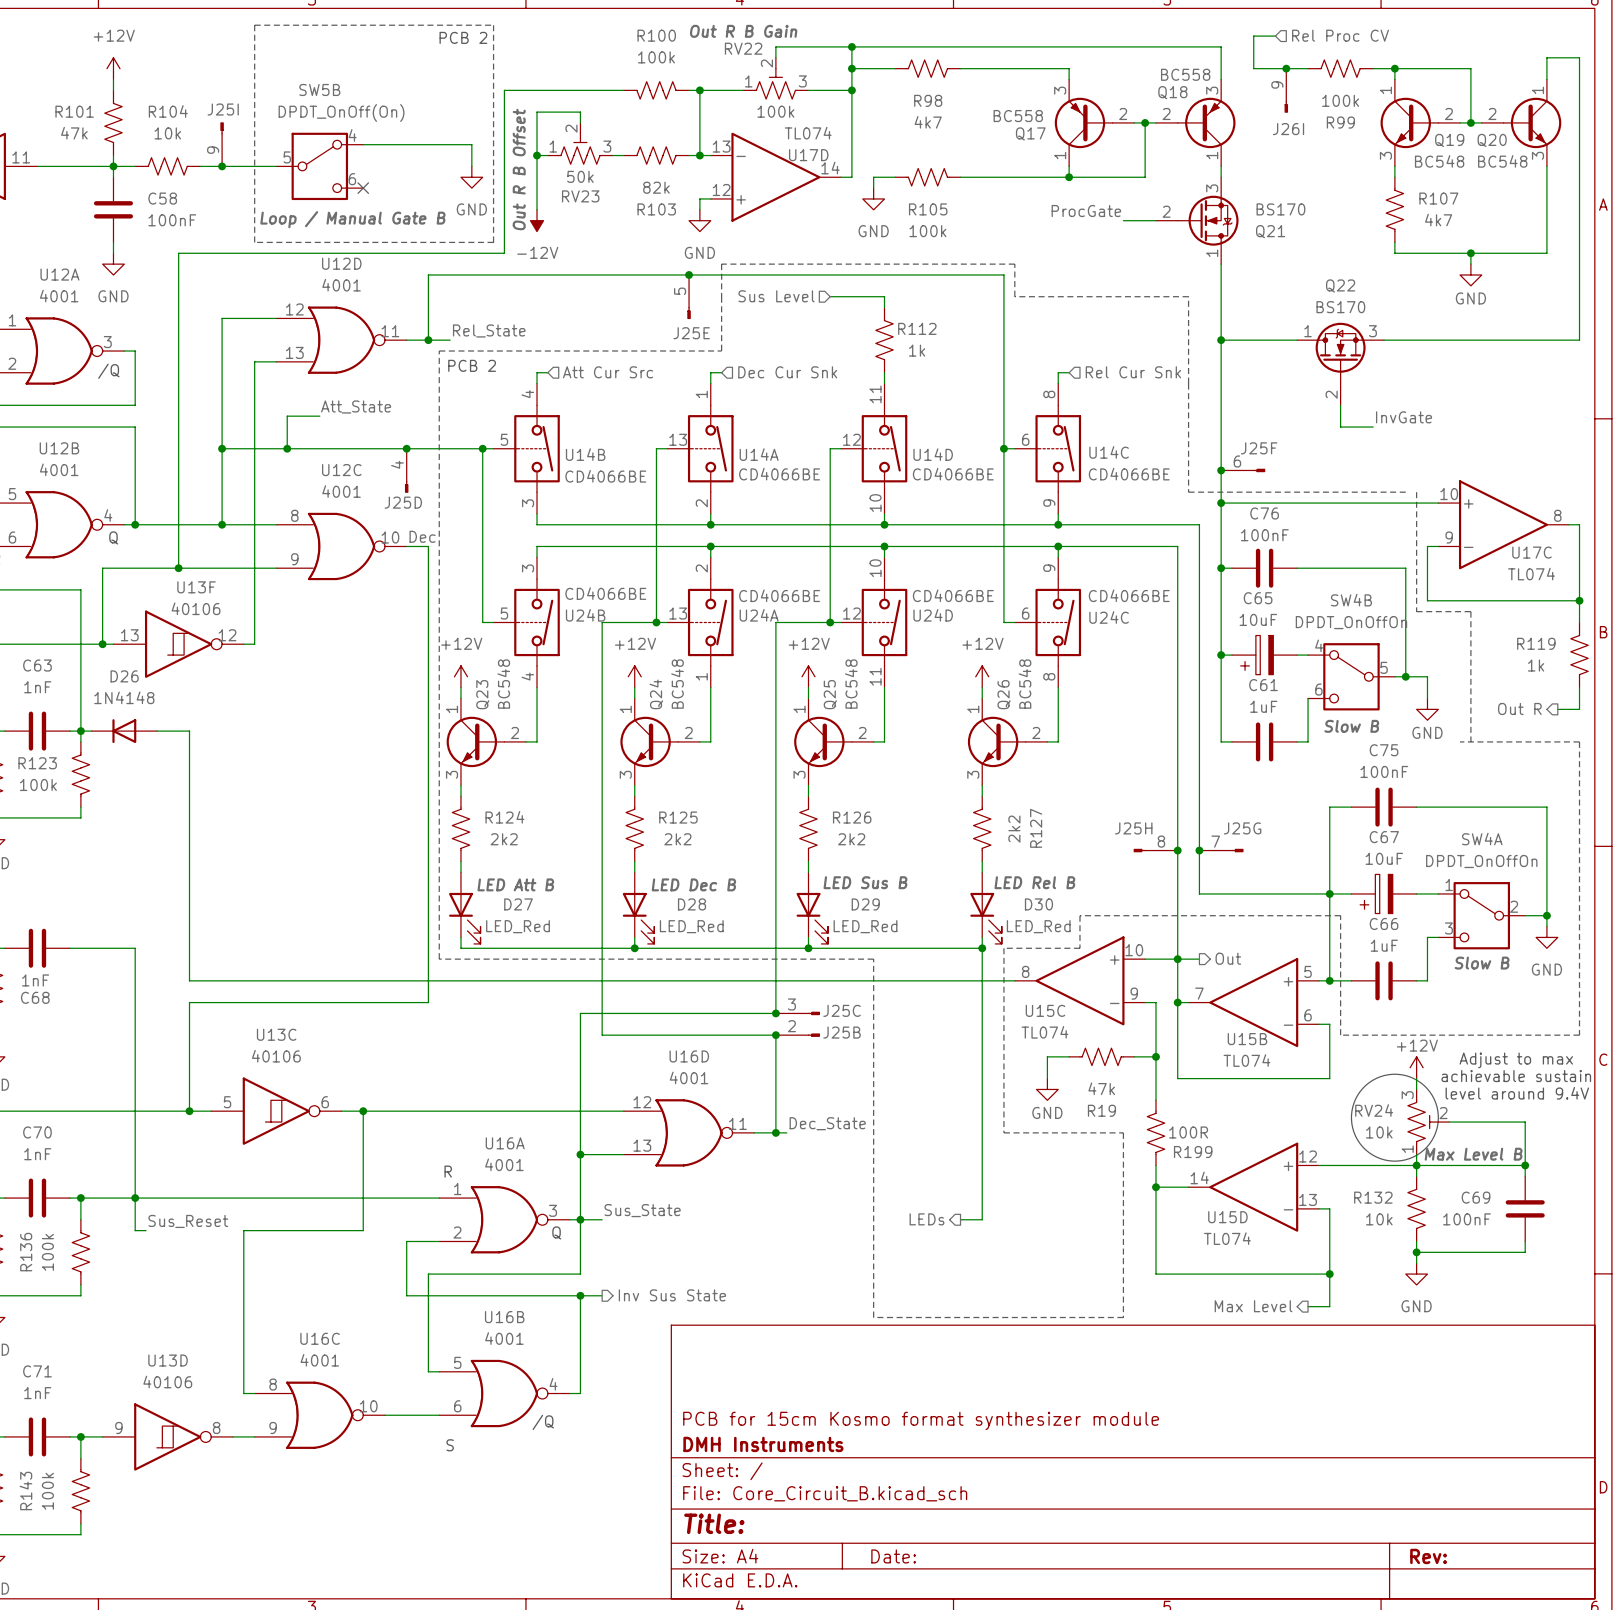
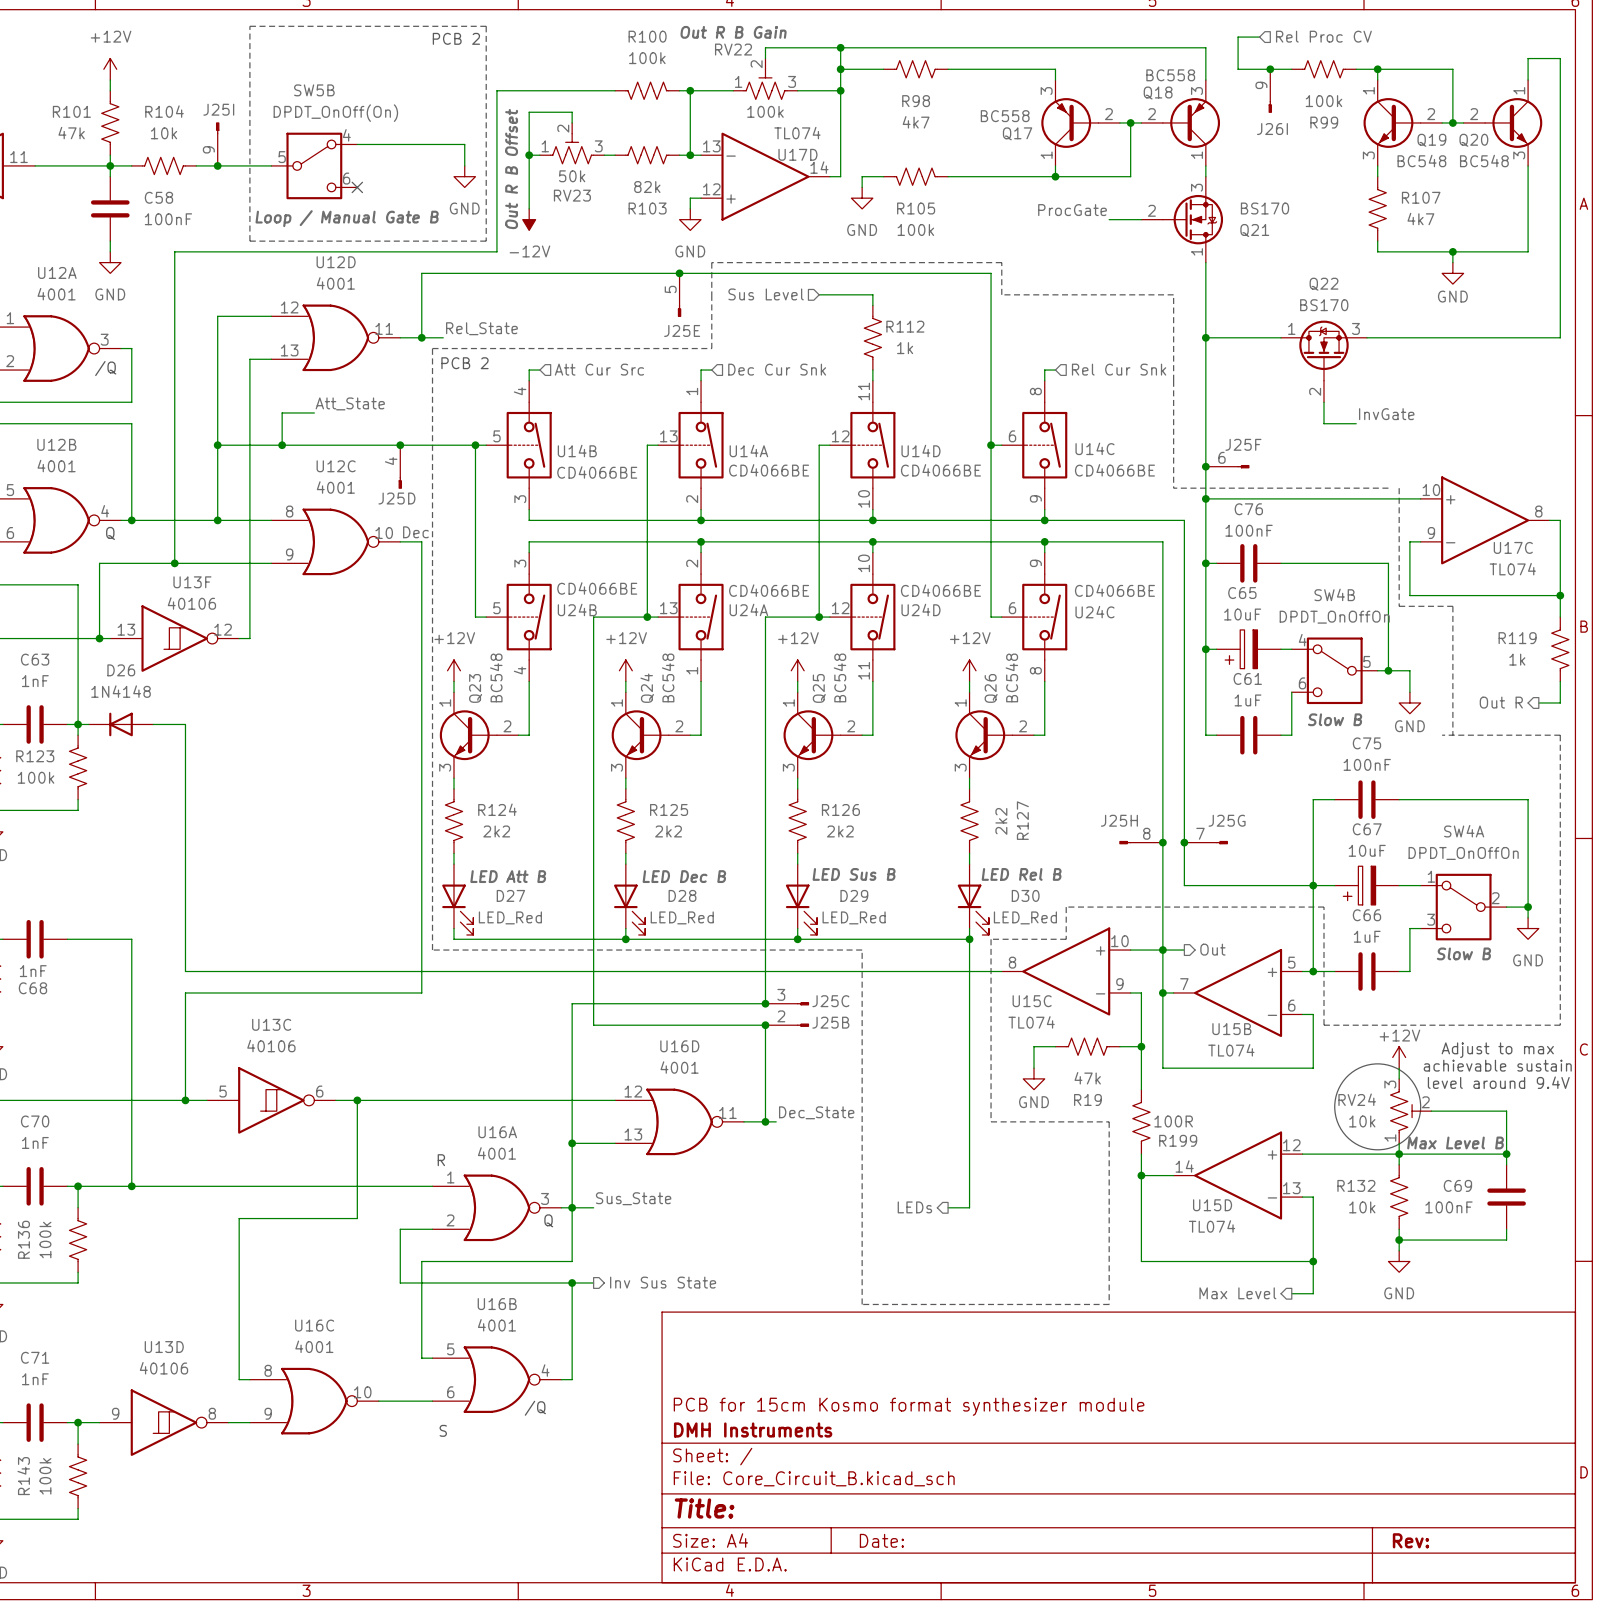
wire: (135, 1198) (135, 1230) (146, 1230) -> none
label: Sus_Reset (188, 1221) -> none

